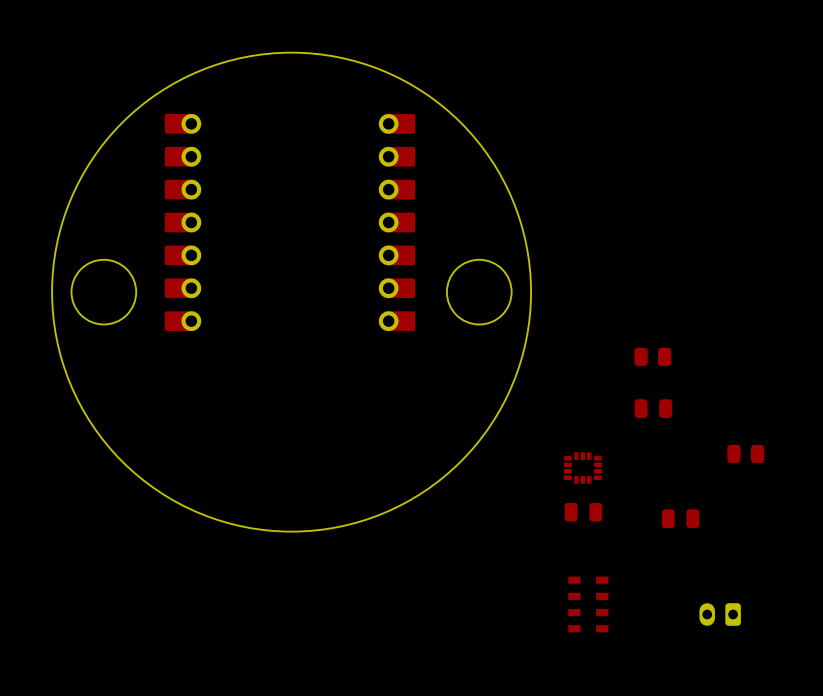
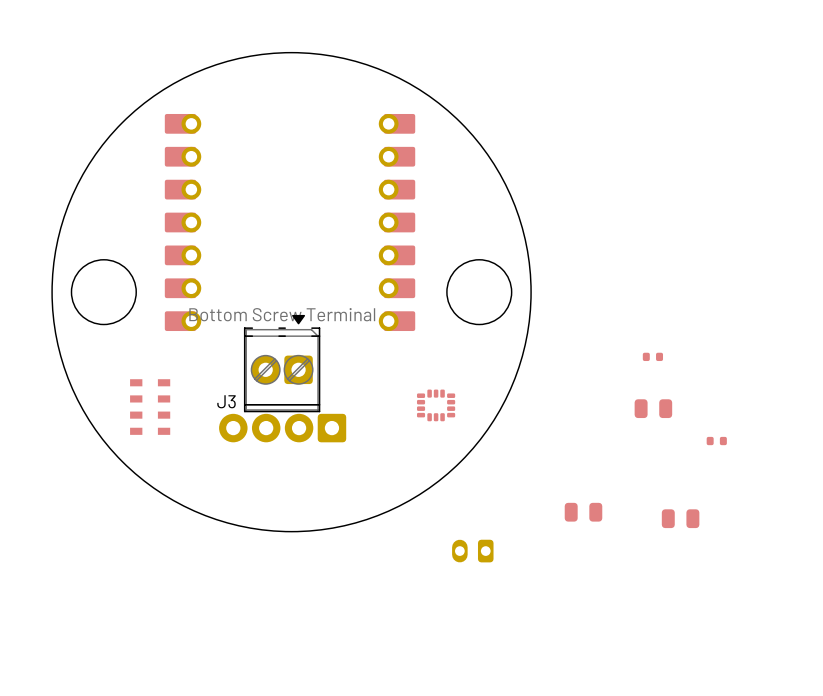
part footprint: [634, 347, 672, 366] -> [642, 352, 664, 362]
J3: none -> Bottom Screw Terminal (282, 363)
part: none -> (150, 407)
part: none -> (282, 428)
part: none -> (716, 441)
part: (745, 453) -> none
part position: (582, 468) -> (436, 405)
part: (588, 604) -> none
part position: (720, 614) -> (472, 551)

